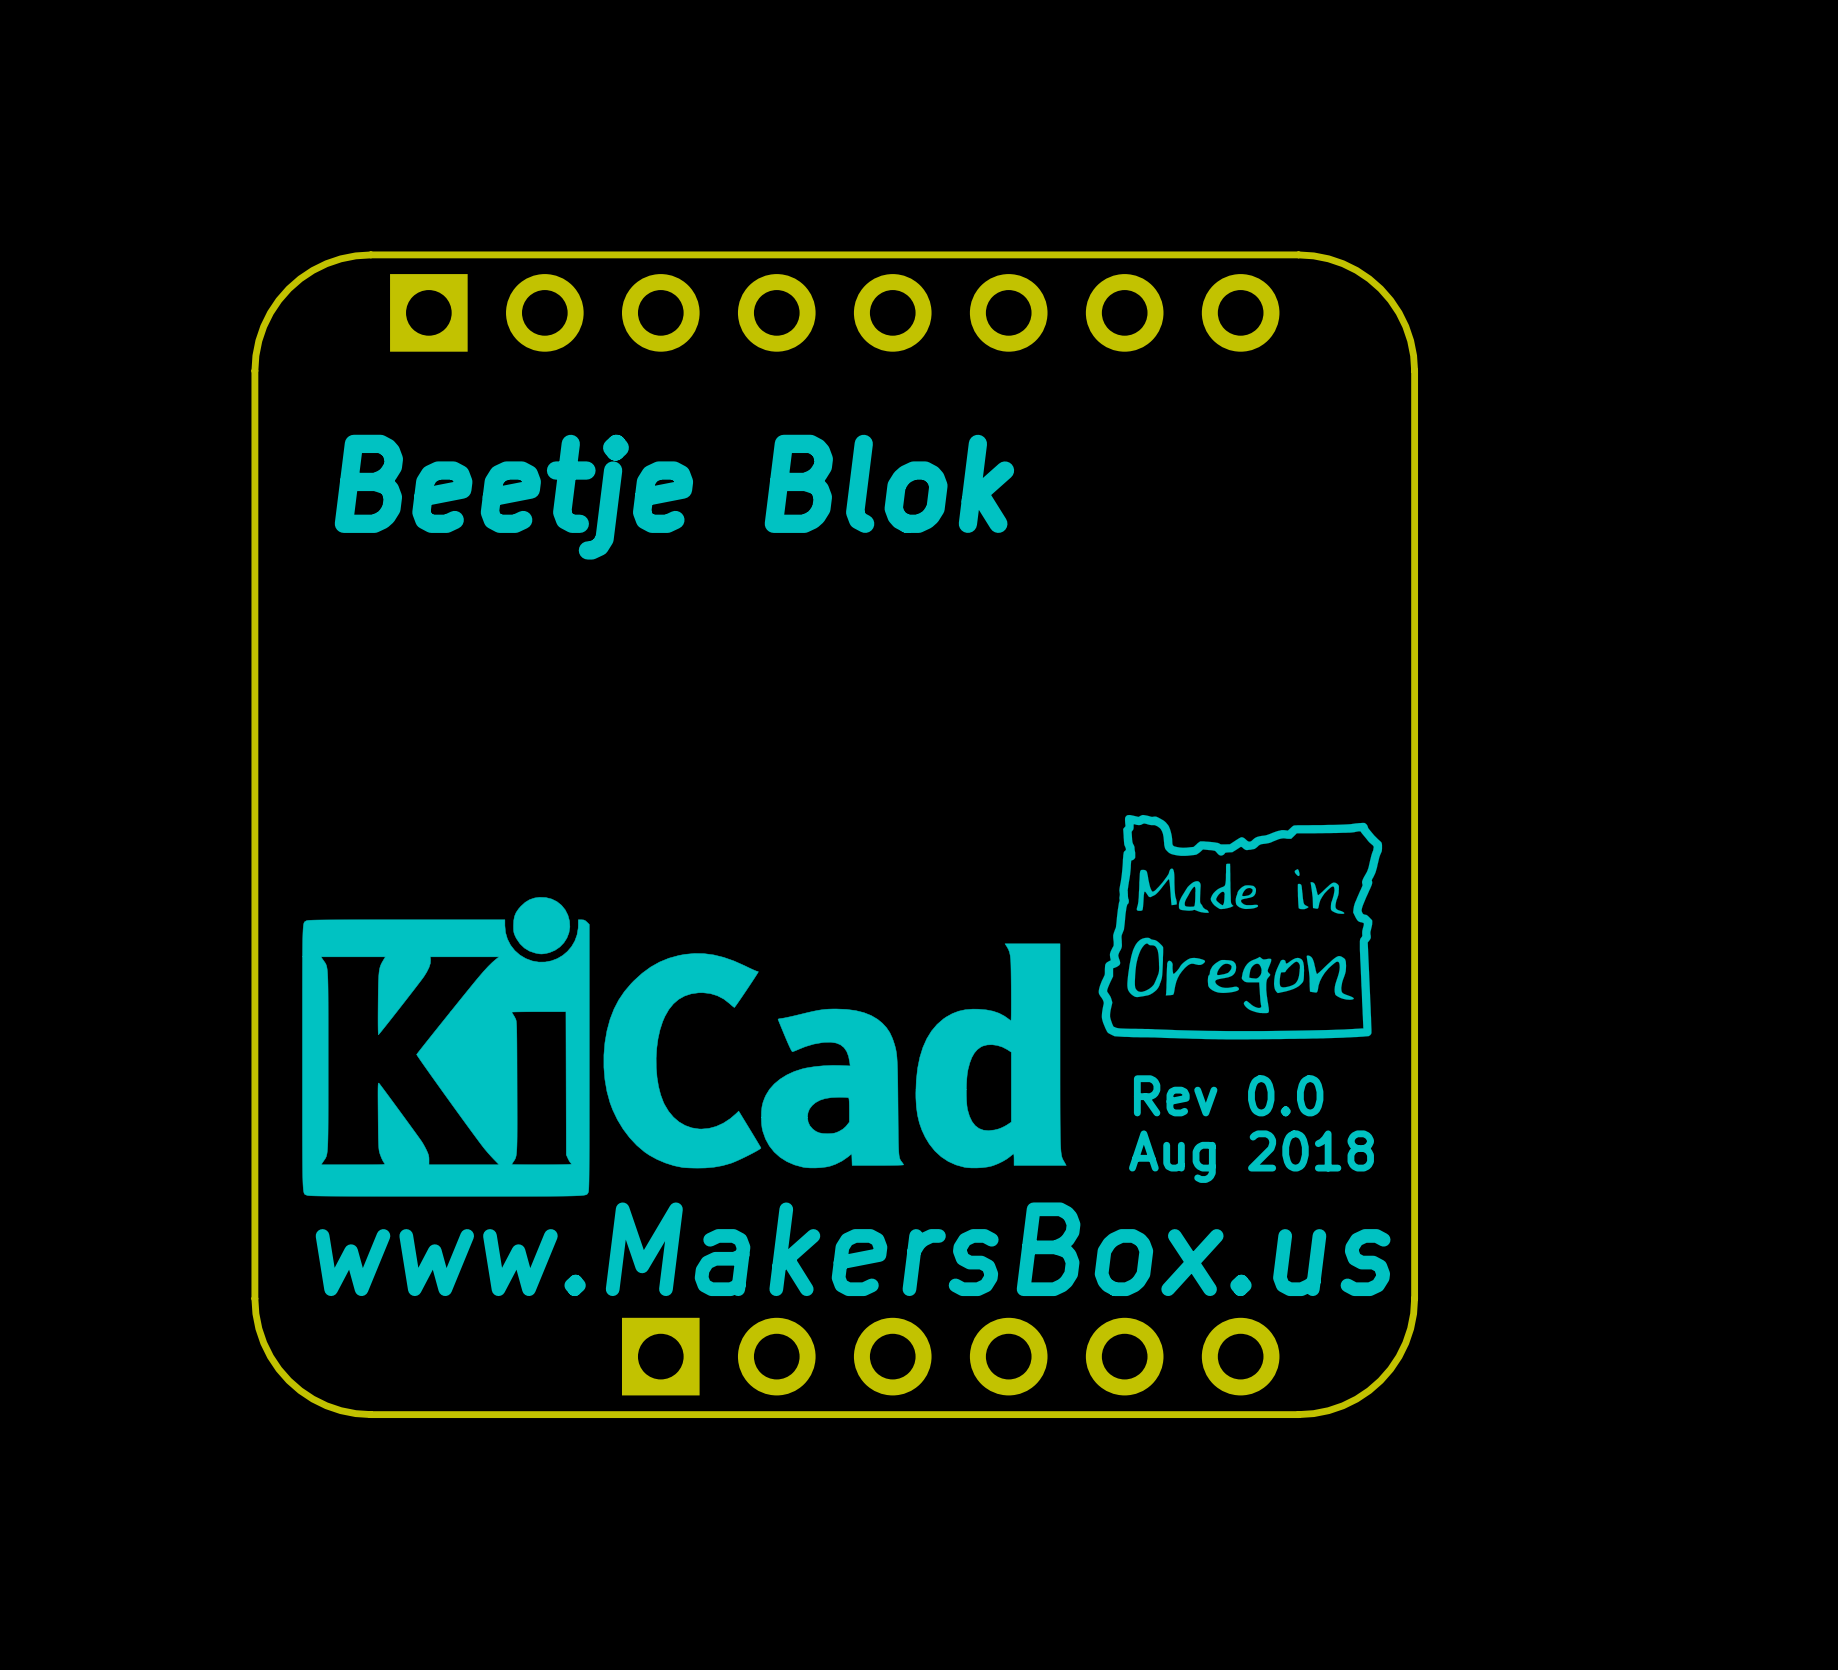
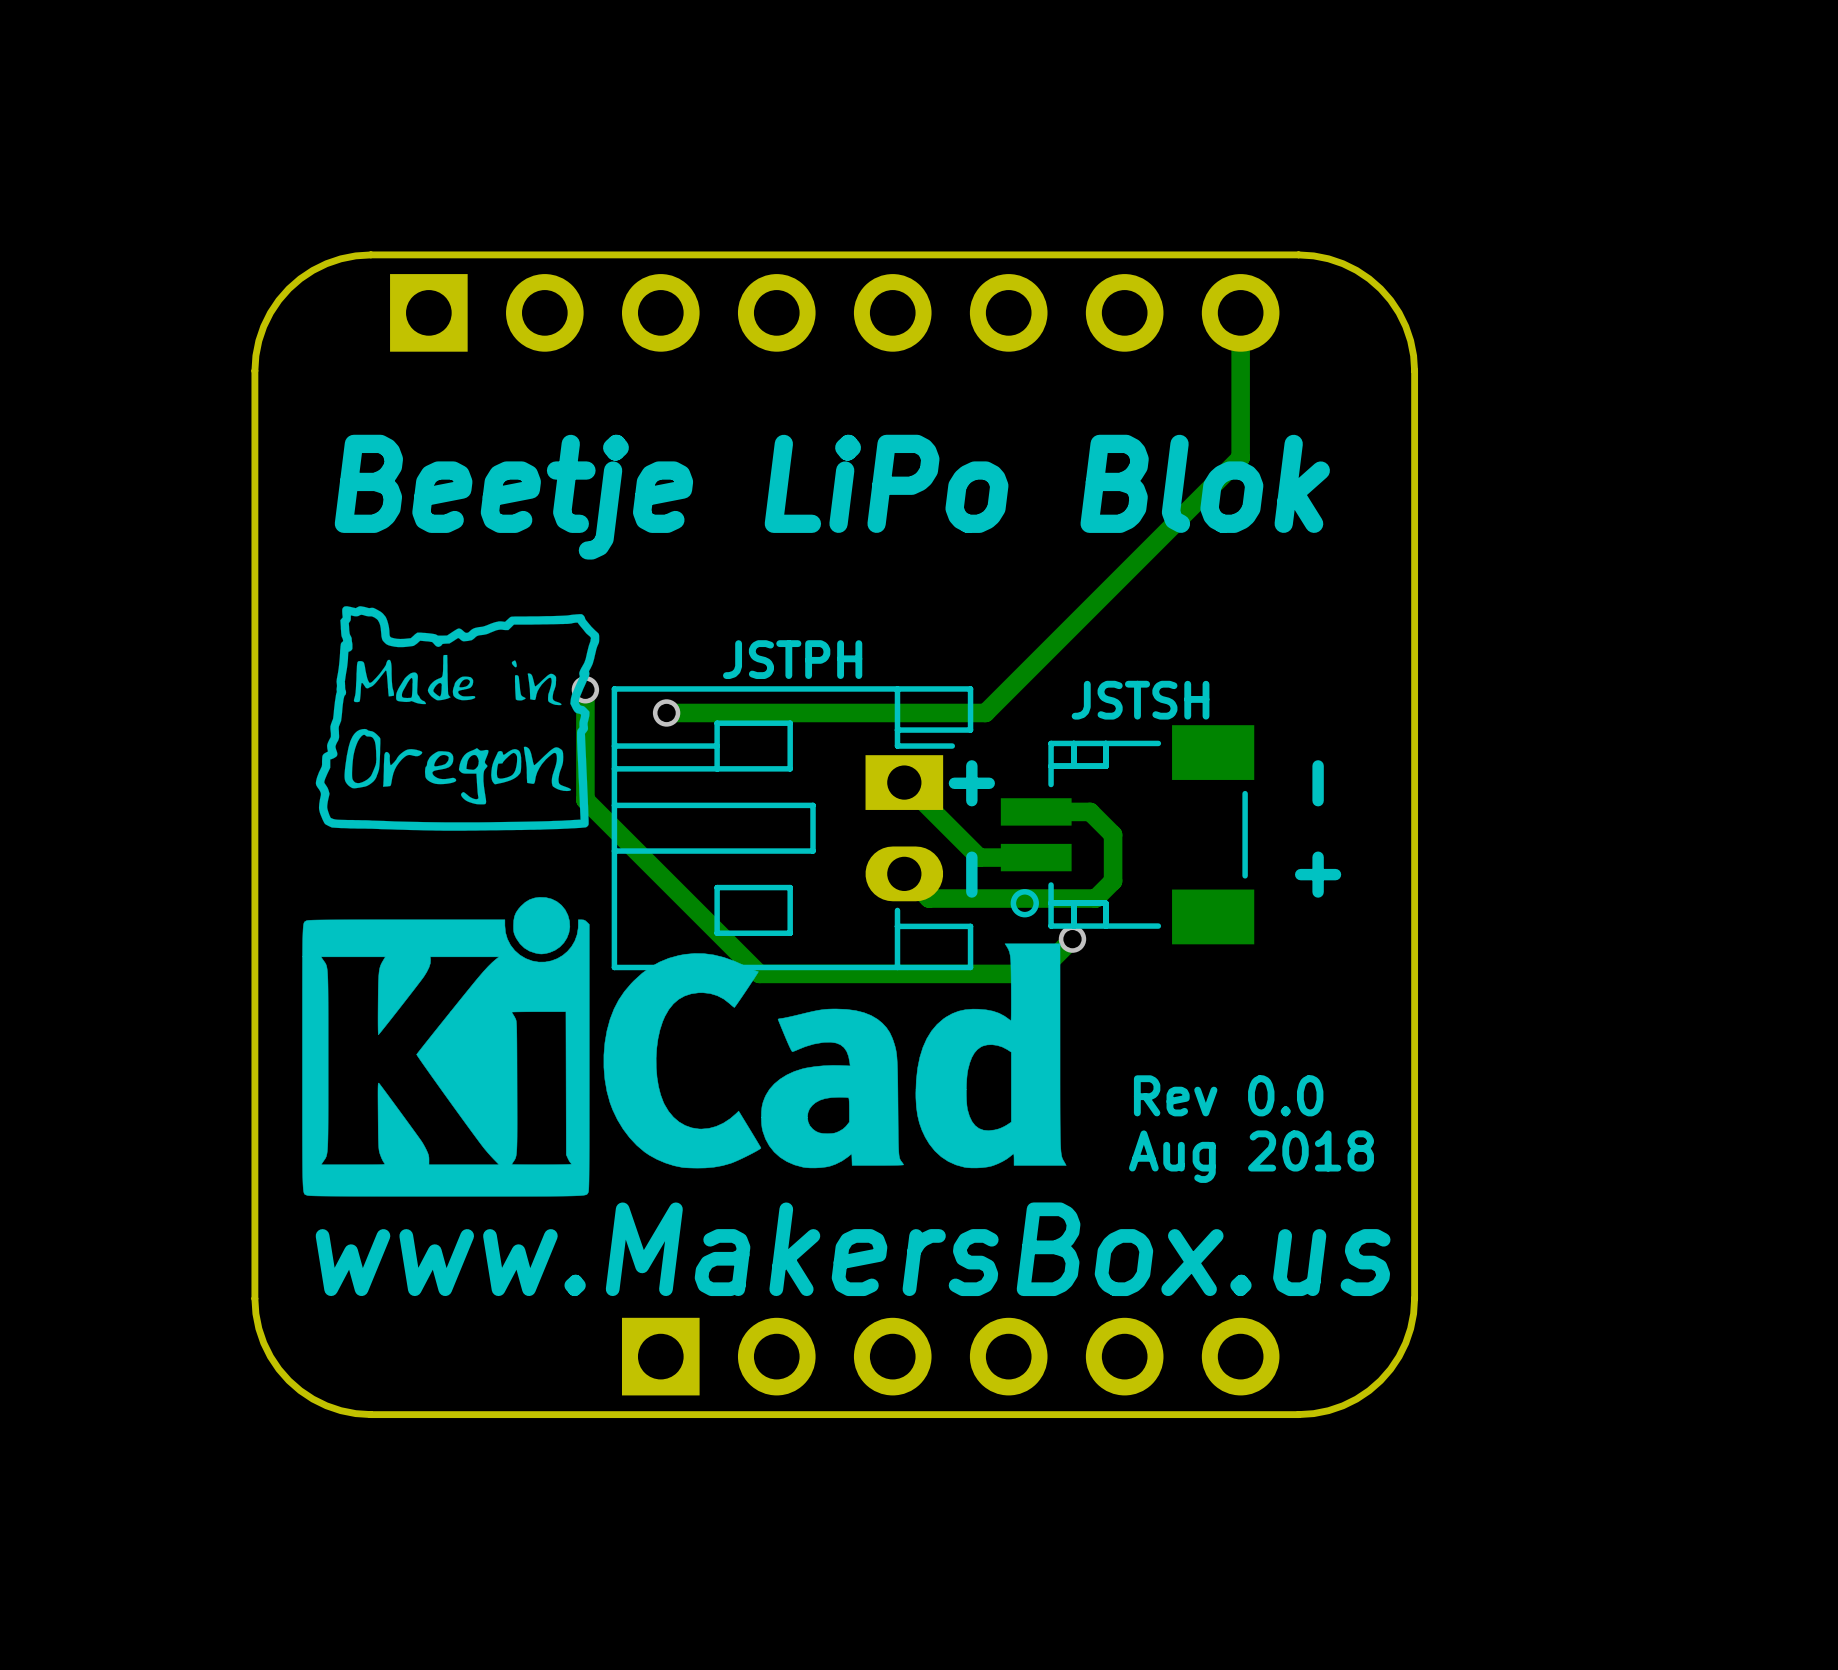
track: none -> (1240, 312) (1240, 457) (985, 712) (666, 712)
text: Beetje Blok (674, 497) -> Beetje LiPo Blok (832, 497)
track: none -> (585, 689) (585, 799) (759, 973) (1037, 973) (1072, 939)
via: none -> (585, 689)
via: none -> (666, 712)
track: none -> (904, 782) (979, 857) (1036, 857)
track: none -> (1036, 811) (1090, 811) (1113, 834) (1113, 881) (1095, 898) (928, 898) (904, 873)
part: none -> JSTPH (792, 828)
text: none -> - + (971, 828)
text: none -> - + (1318, 828)
part: none -> JSTSH (1127, 834)
drawing position: (1240, 927) -> (457, 718)
via: none -> (1072, 939)

